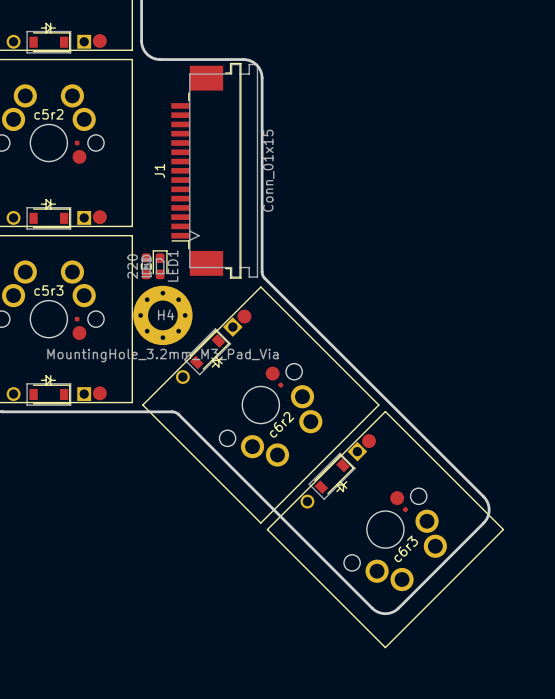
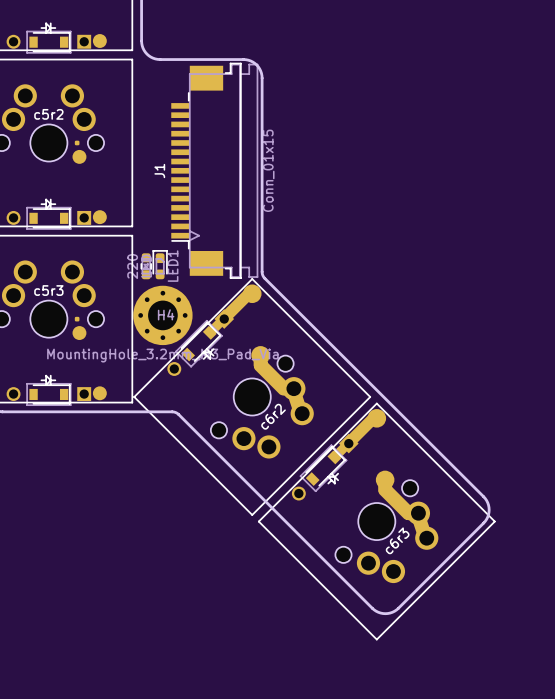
c6r2 footprint: [142, 286, 380, 524] -> [133, 278, 371, 516]
c6r3 footprint: [266, 410, 505, 649] -> [258, 402, 496, 641]

